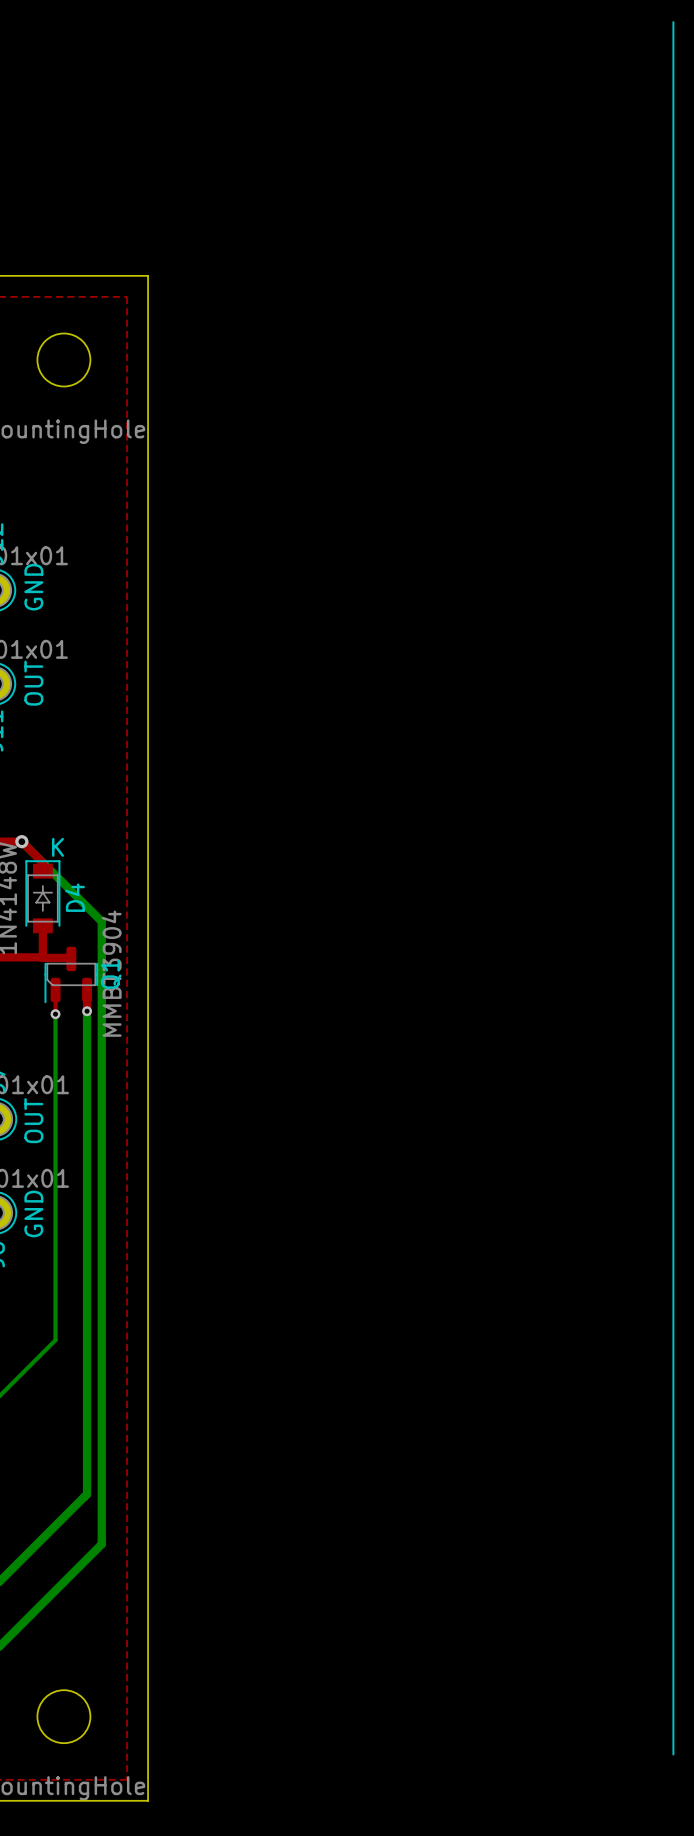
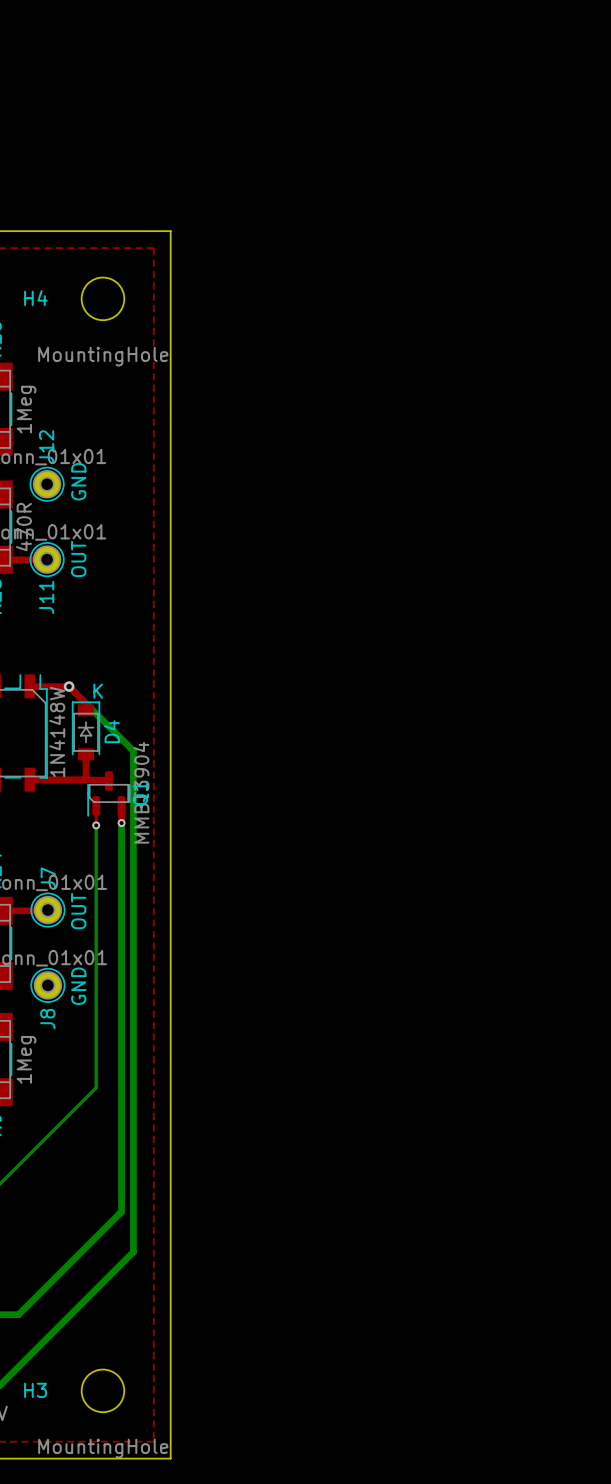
line: (673, 22) (673, 1754) -> none

